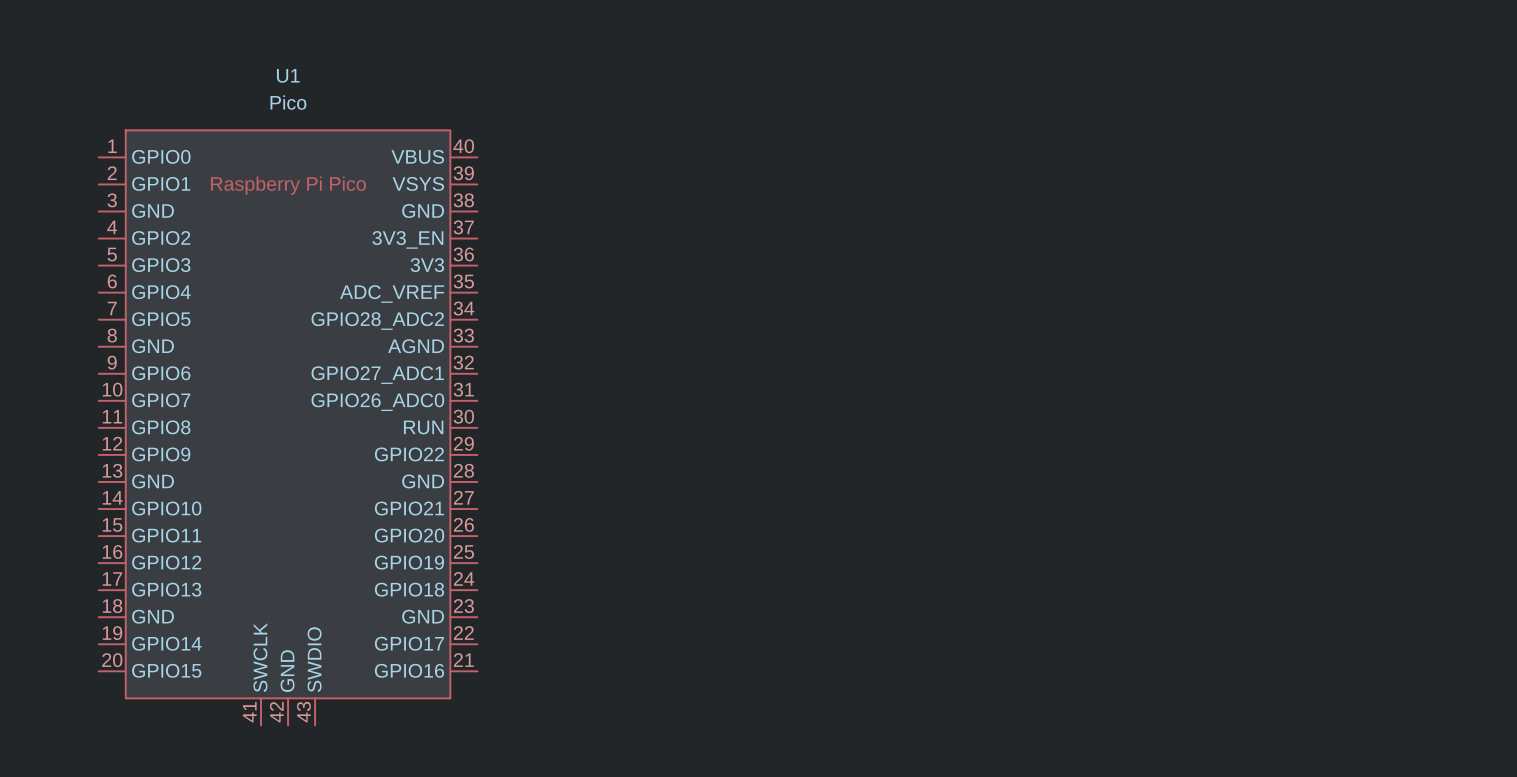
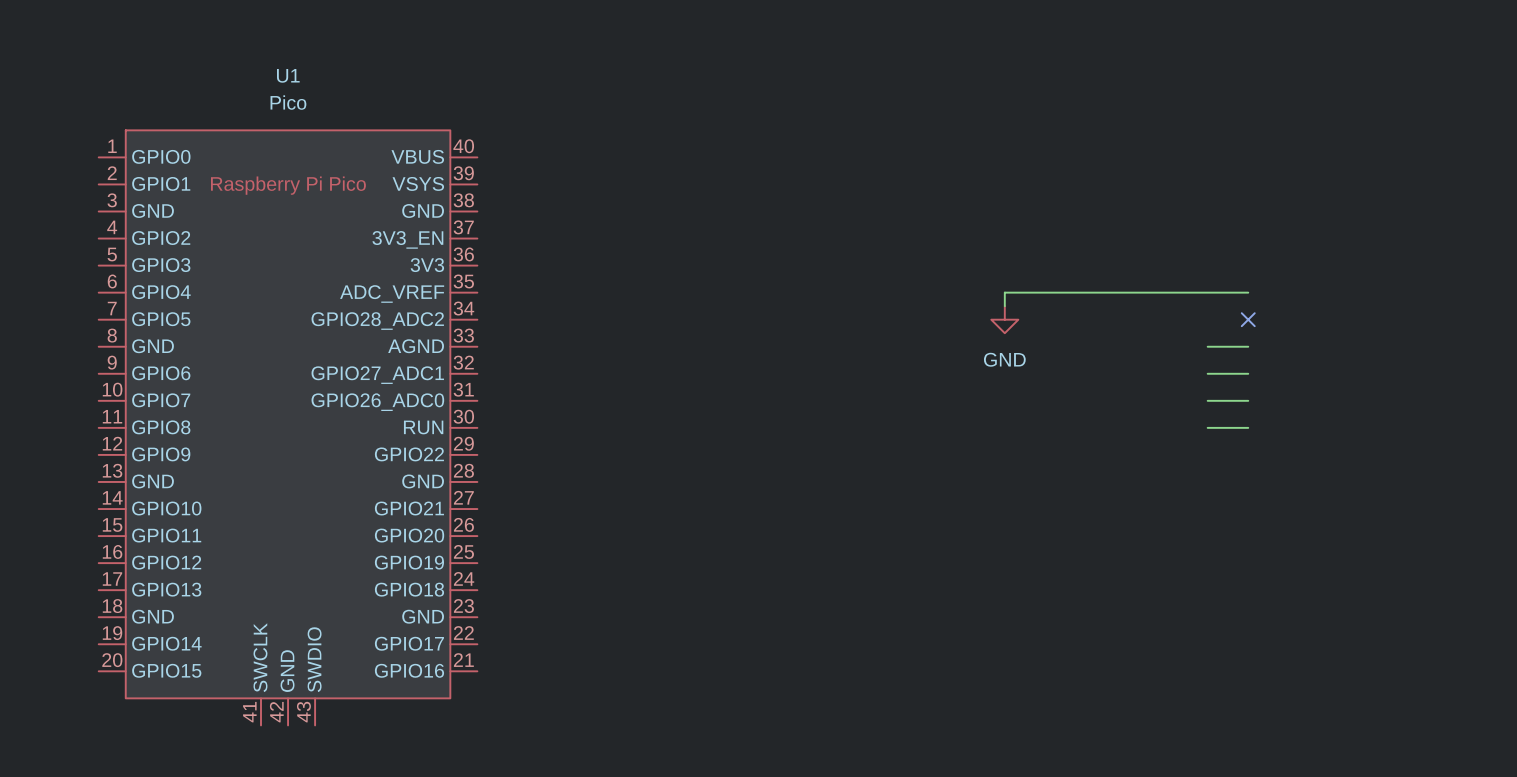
wire: none -> (1248, 292) (1004, 292) (1004, 306)
power symbol: none -> GND (1004, 319)
no-connect mark: none -> (1248, 319)
wire: none -> (1207, 346) (1248, 346)
wire: none -> (1207, 373) (1248, 373)
wire: none -> (1207, 400) (1248, 400)
wire: none -> (1207, 427) (1248, 427)

